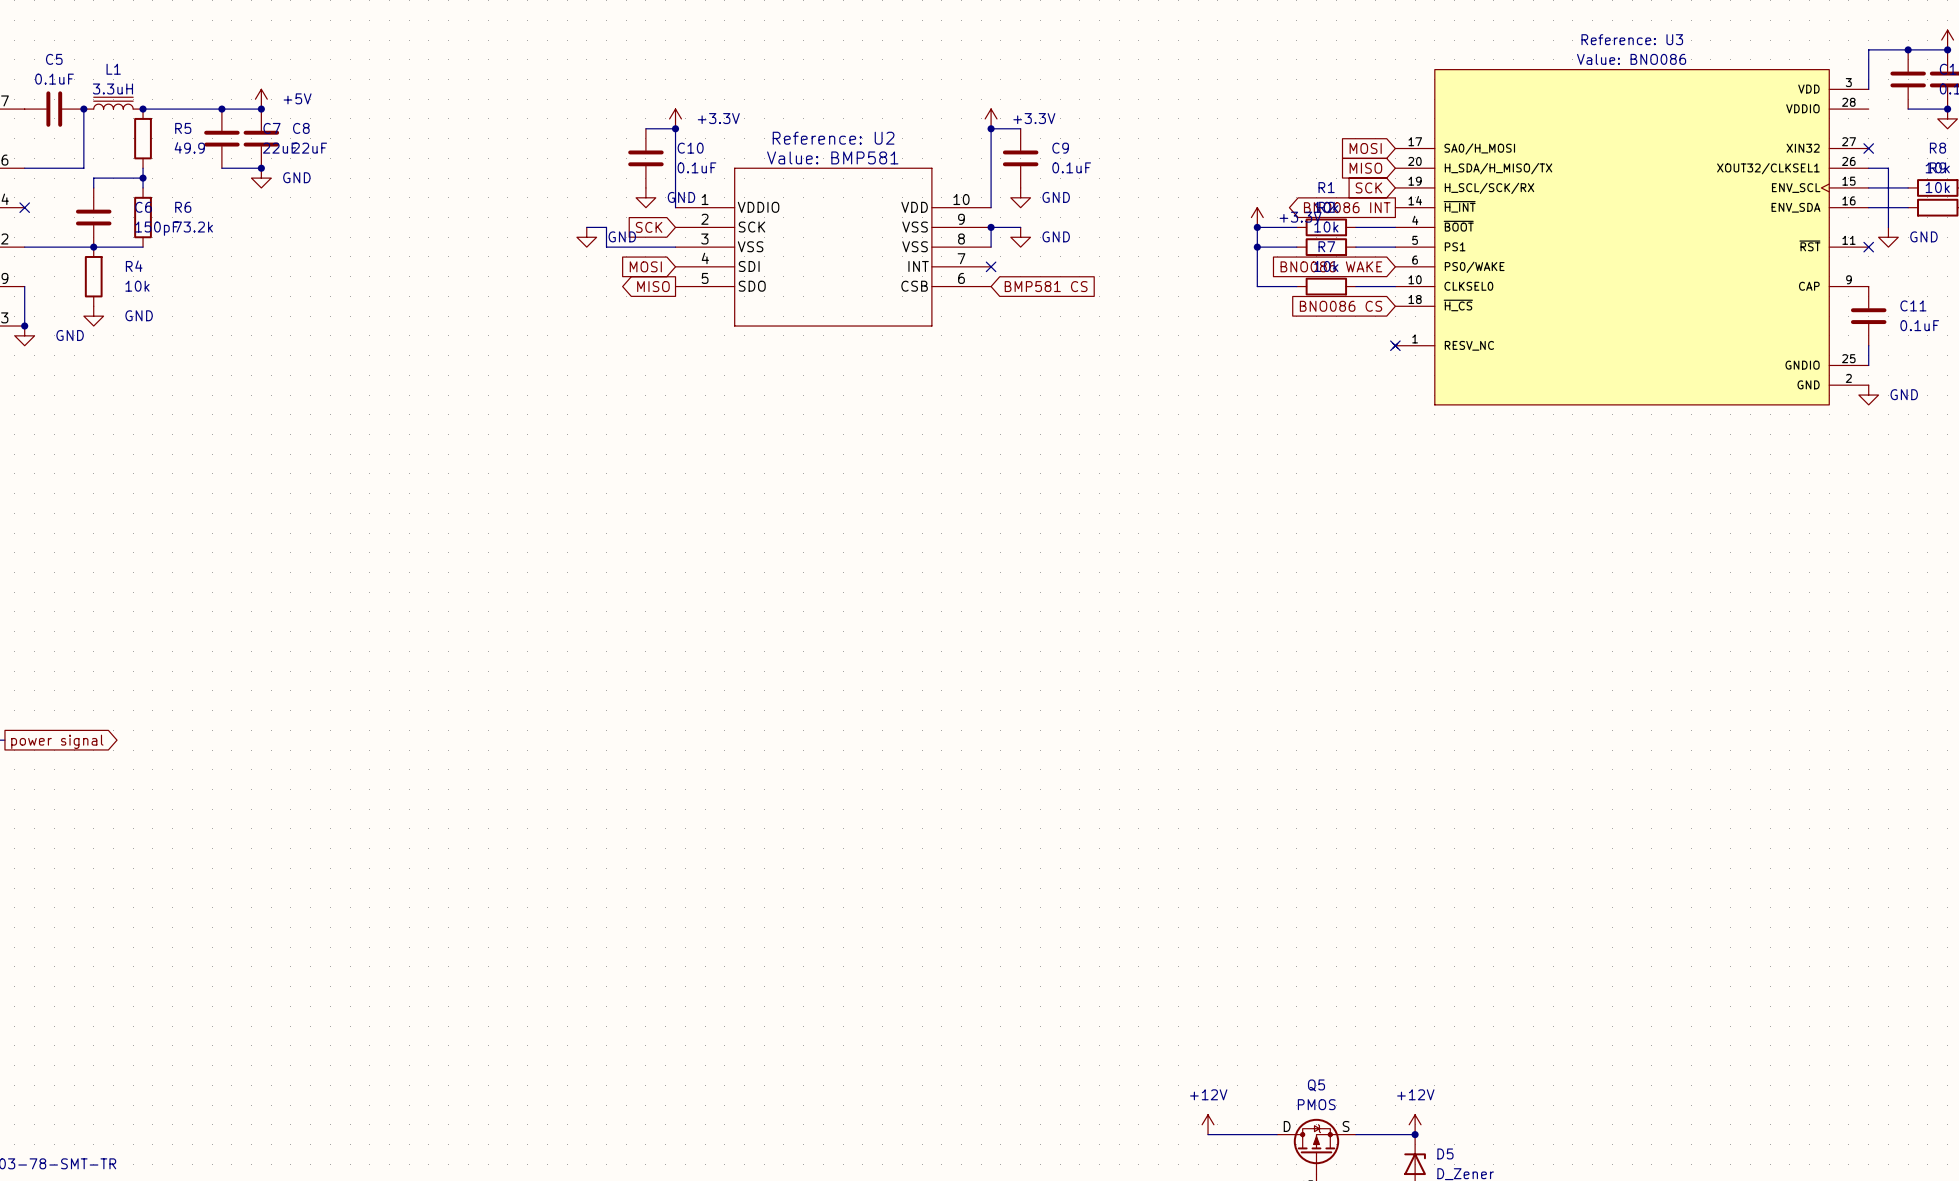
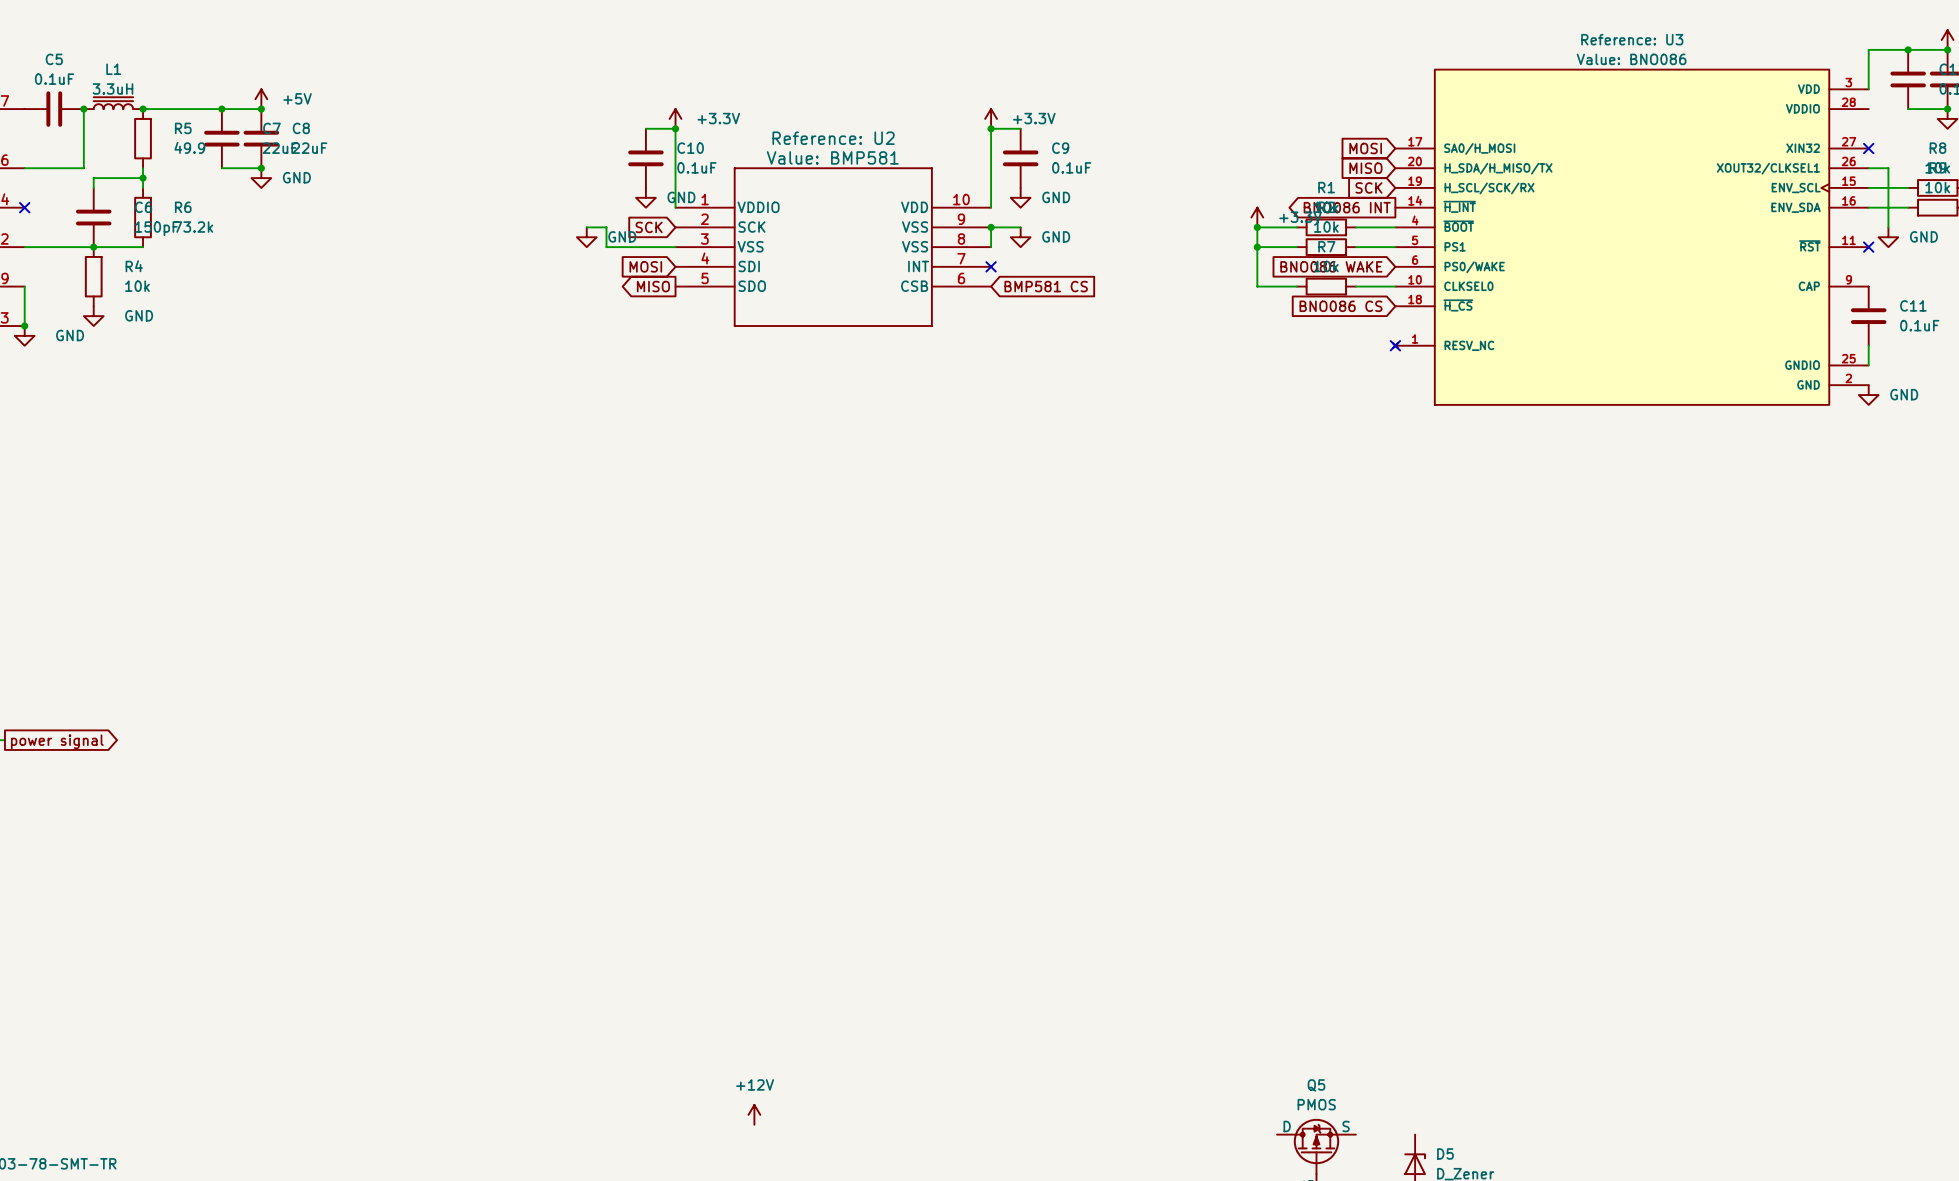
power symbol: none -> +12V (754, 1114)
power symbol: +12V (1208, 1124) -> none
power symbol: +12V (1415, 1124) -> none
wire: (1208, 1134) (1277, 1134) -> none
wire: (1355, 1134) (1415, 1134) -> none
junction: (1415, 1134) -> none

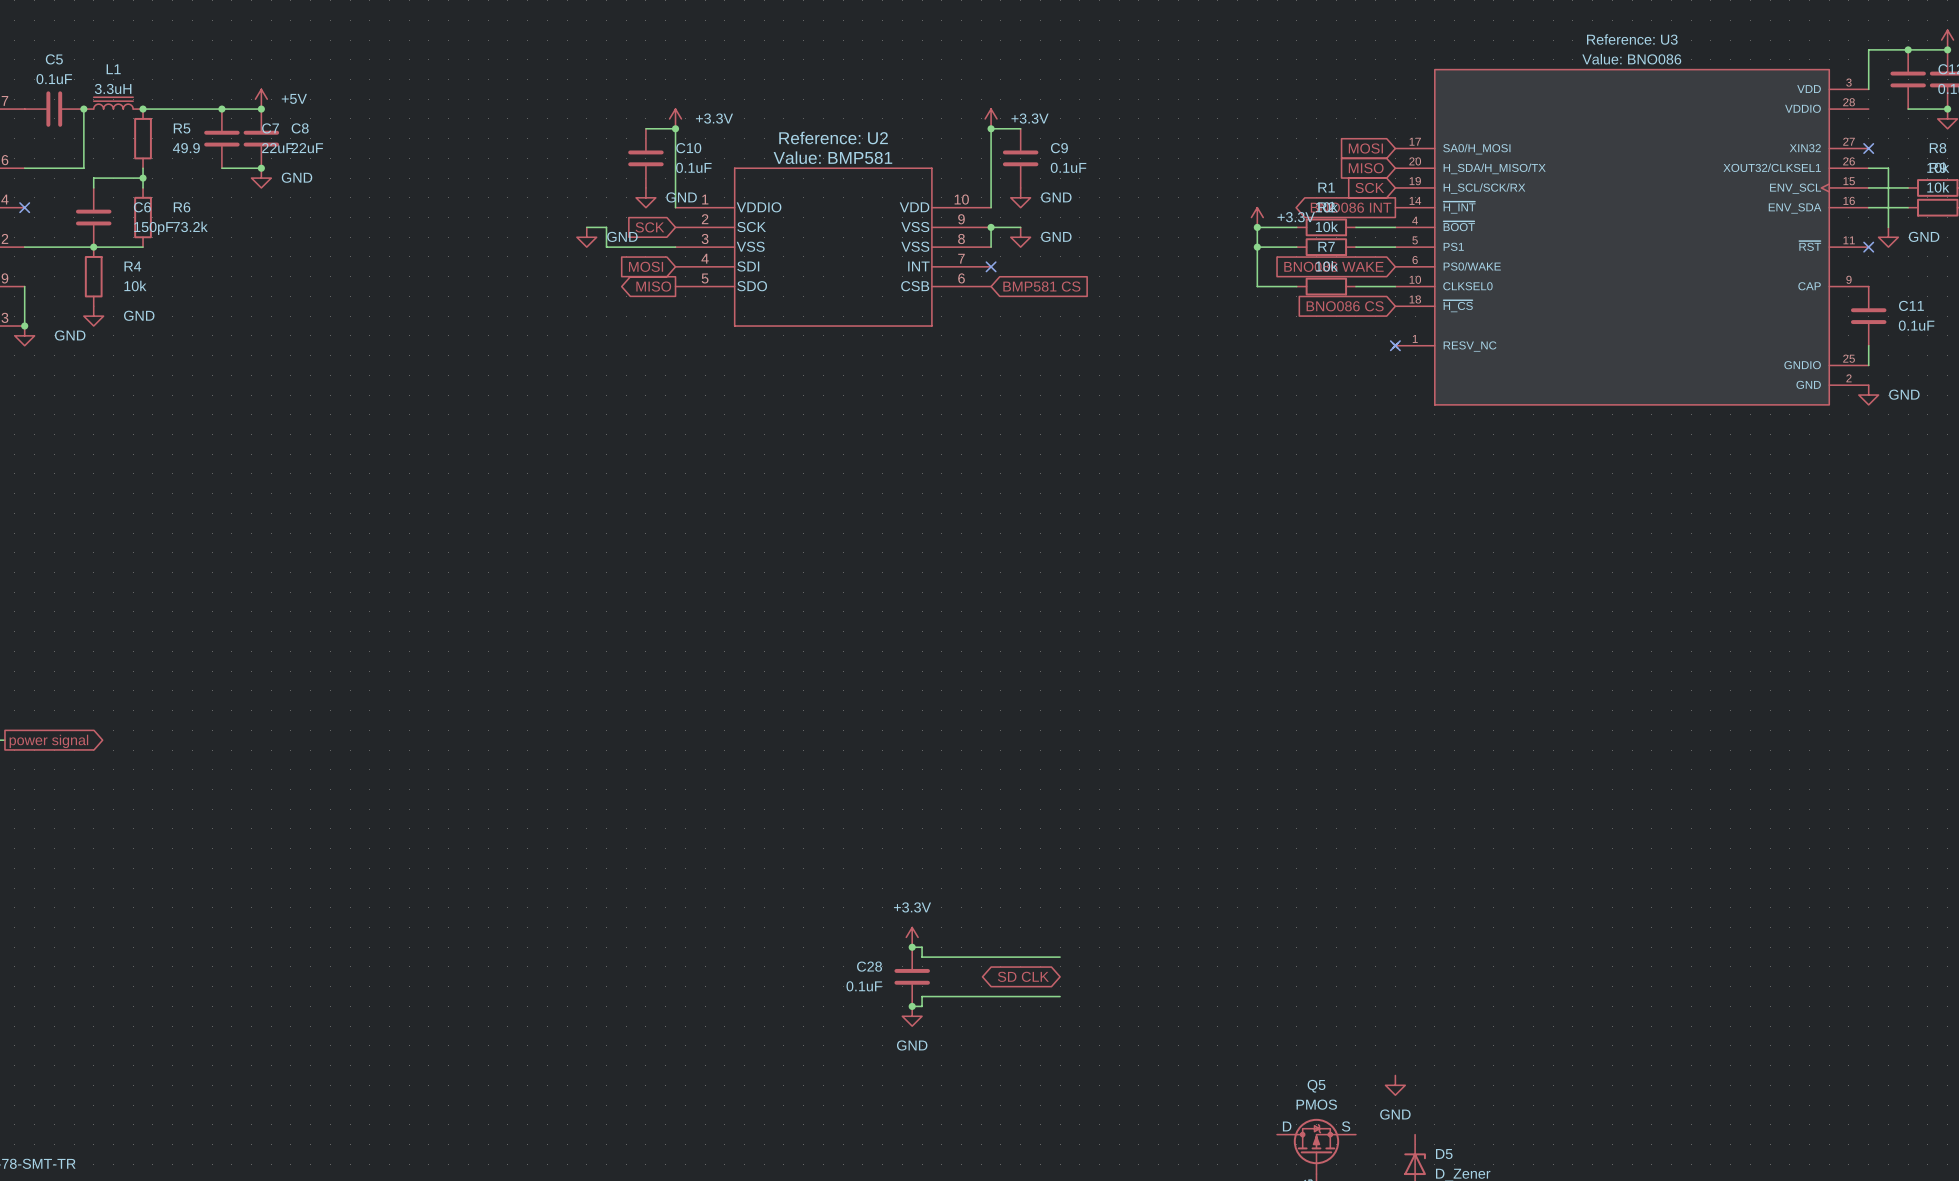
power symbol: none -> +3.3V (912, 937)
wire: none -> (912, 947) (922, 947) (922, 957) (1060, 957)
junction: none -> (912, 947)
C28: none -> 0.1uF (912, 976)
global label: none -> SD CLK (1023, 976)
wire: none -> (1060, 996) (922, 996) (922, 1006) (912, 1006)
junction: none -> (912, 1006)
power symbol: none -> GND (912, 1016)
power symbol: none -> GND (1395, 1085)
power symbol: +12V (754, 1114) -> none

